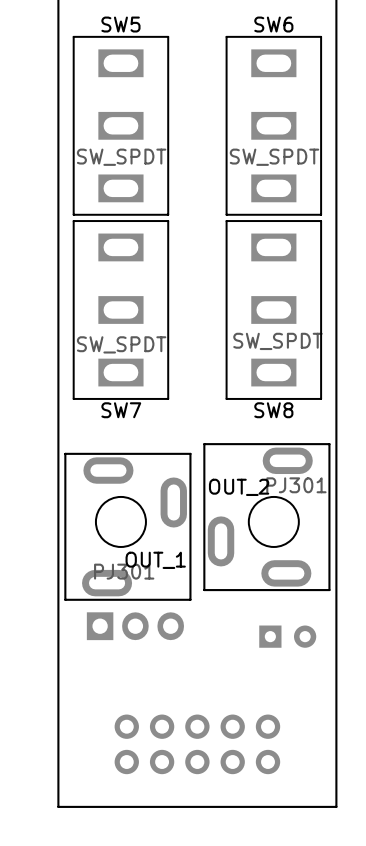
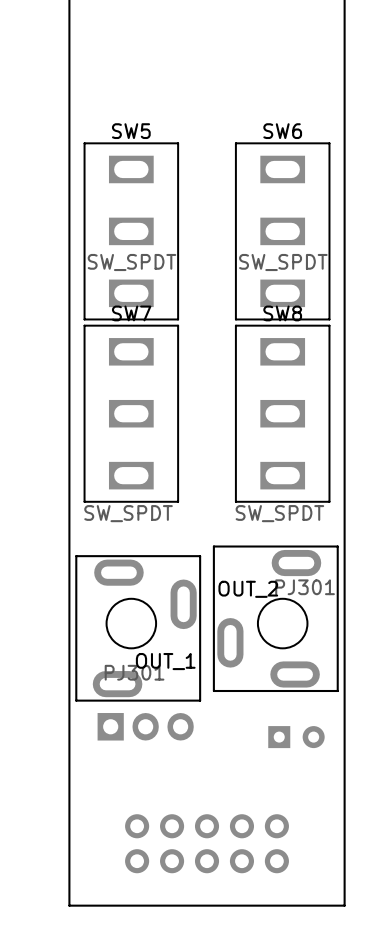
SW8 value position: SW_SPDT (277, 341) -> SW_SPDT (279, 513)
SW7 value position: SW_SPDT (121, 344) -> SW_SPDT (128, 513)
SW7 name position: SW7 (121, 410) -> SW7 (131, 313)
SW8 name position: SW8 (273, 410) -> SW8 (282, 313)

